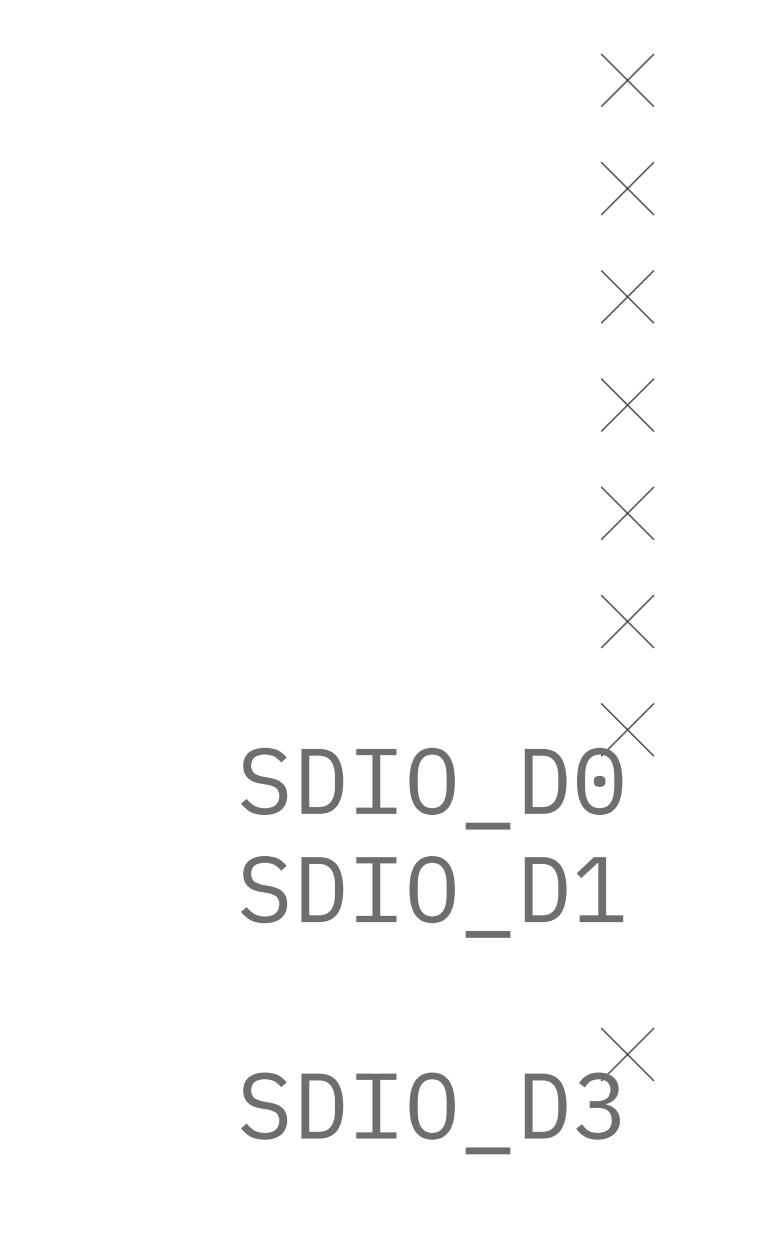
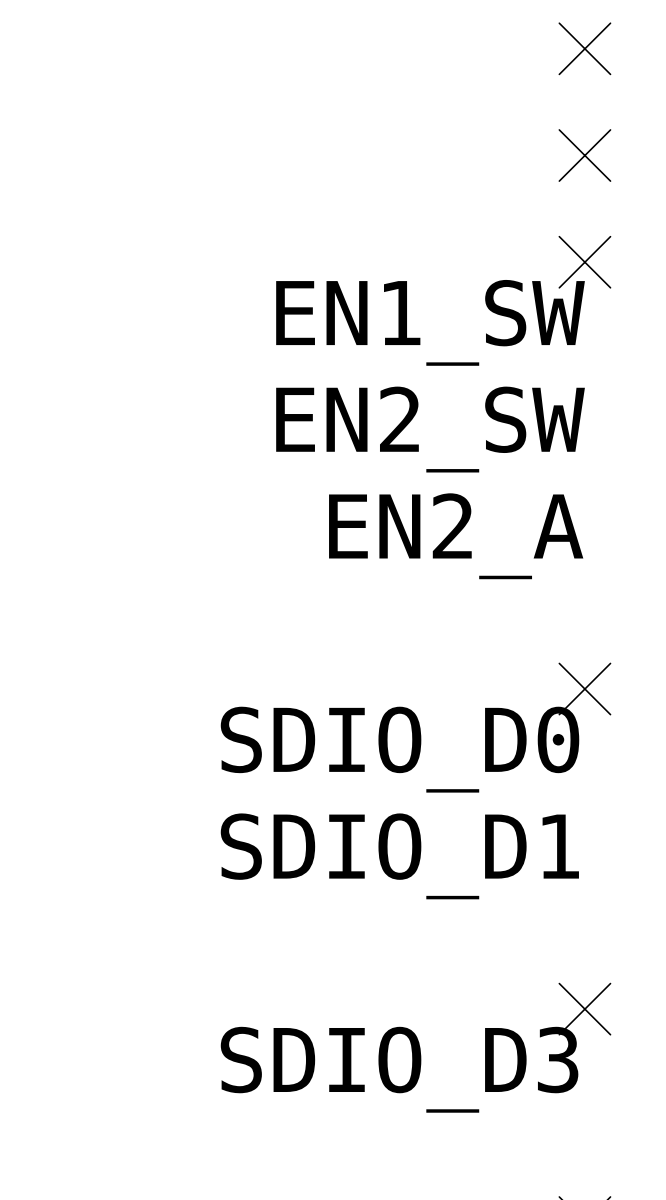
label: none -> EN1_SW (430, 322)
no-connect mark: (627, 405) -> none
label: none -> EN2_SW (430, 429)
no-connect mark: (627, 513) -> none
label: none -> EN2_A (456, 536)
no-connect mark: (627, 621) -> none

